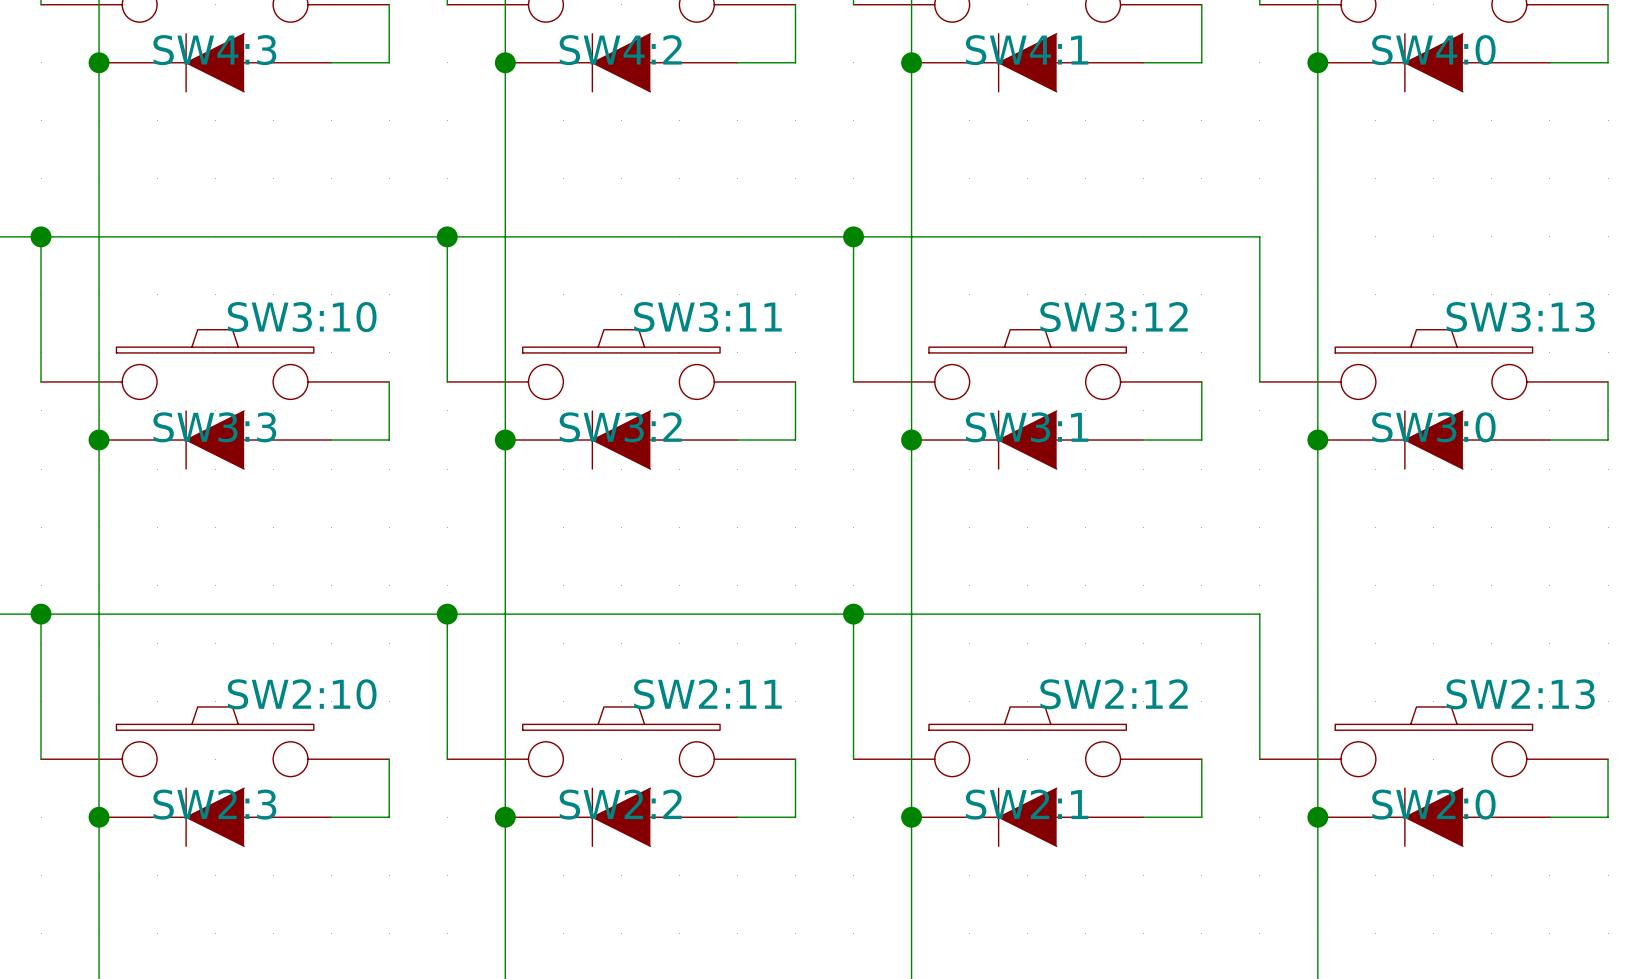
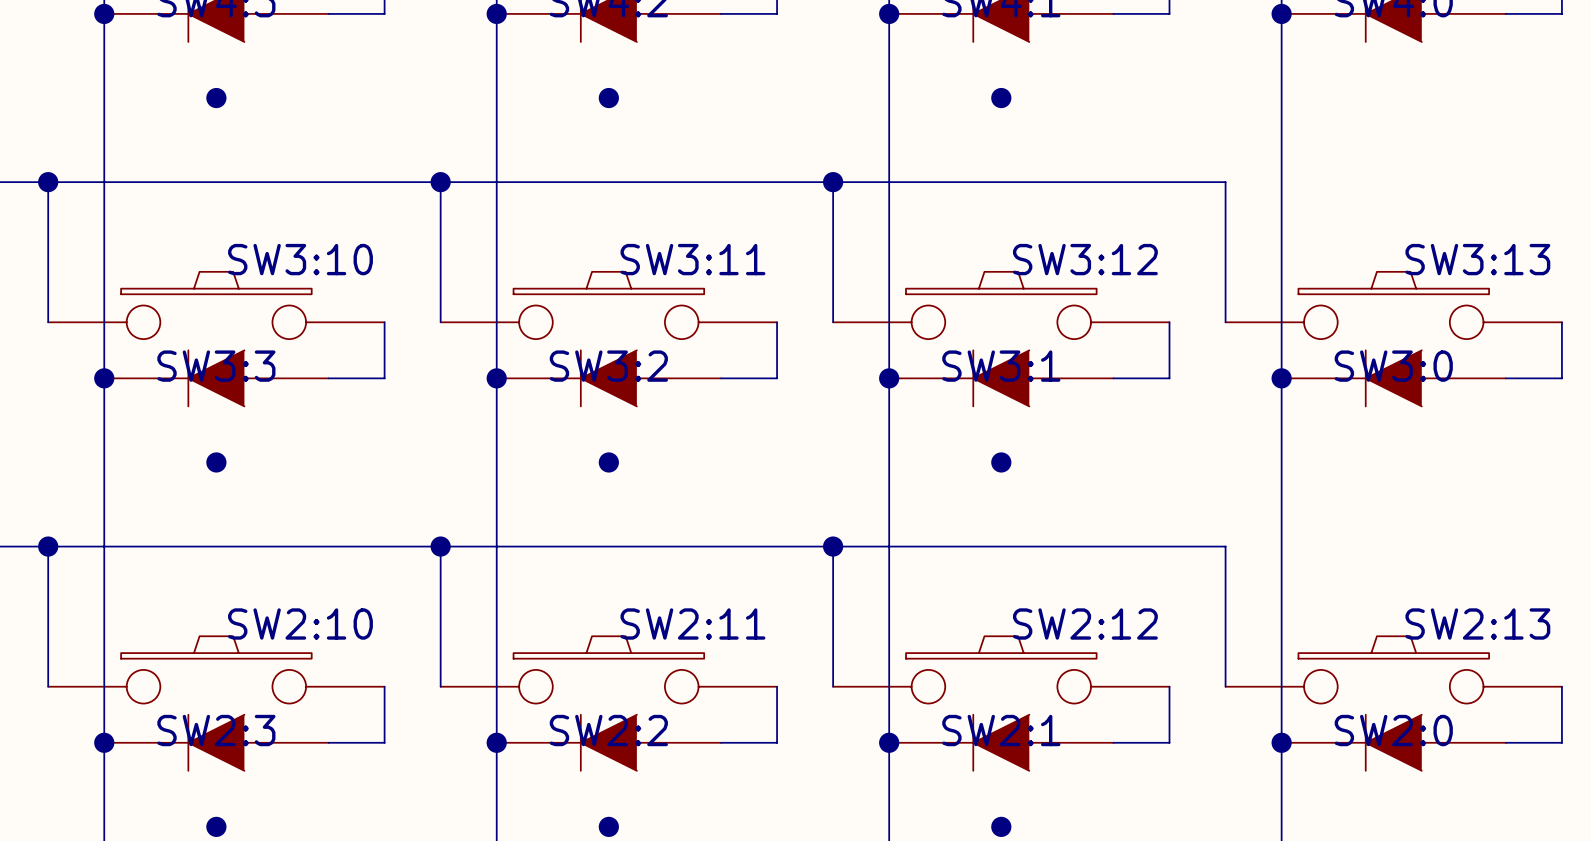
junction: none -> (216, 98)
junction: none -> (608, 98)
junction: none -> (1001, 98)
junction: none -> (216, 462)
junction: none -> (608, 462)
junction: none -> (1001, 462)
junction: none -> (216, 826)
junction: none -> (608, 826)
junction: none -> (1001, 826)

